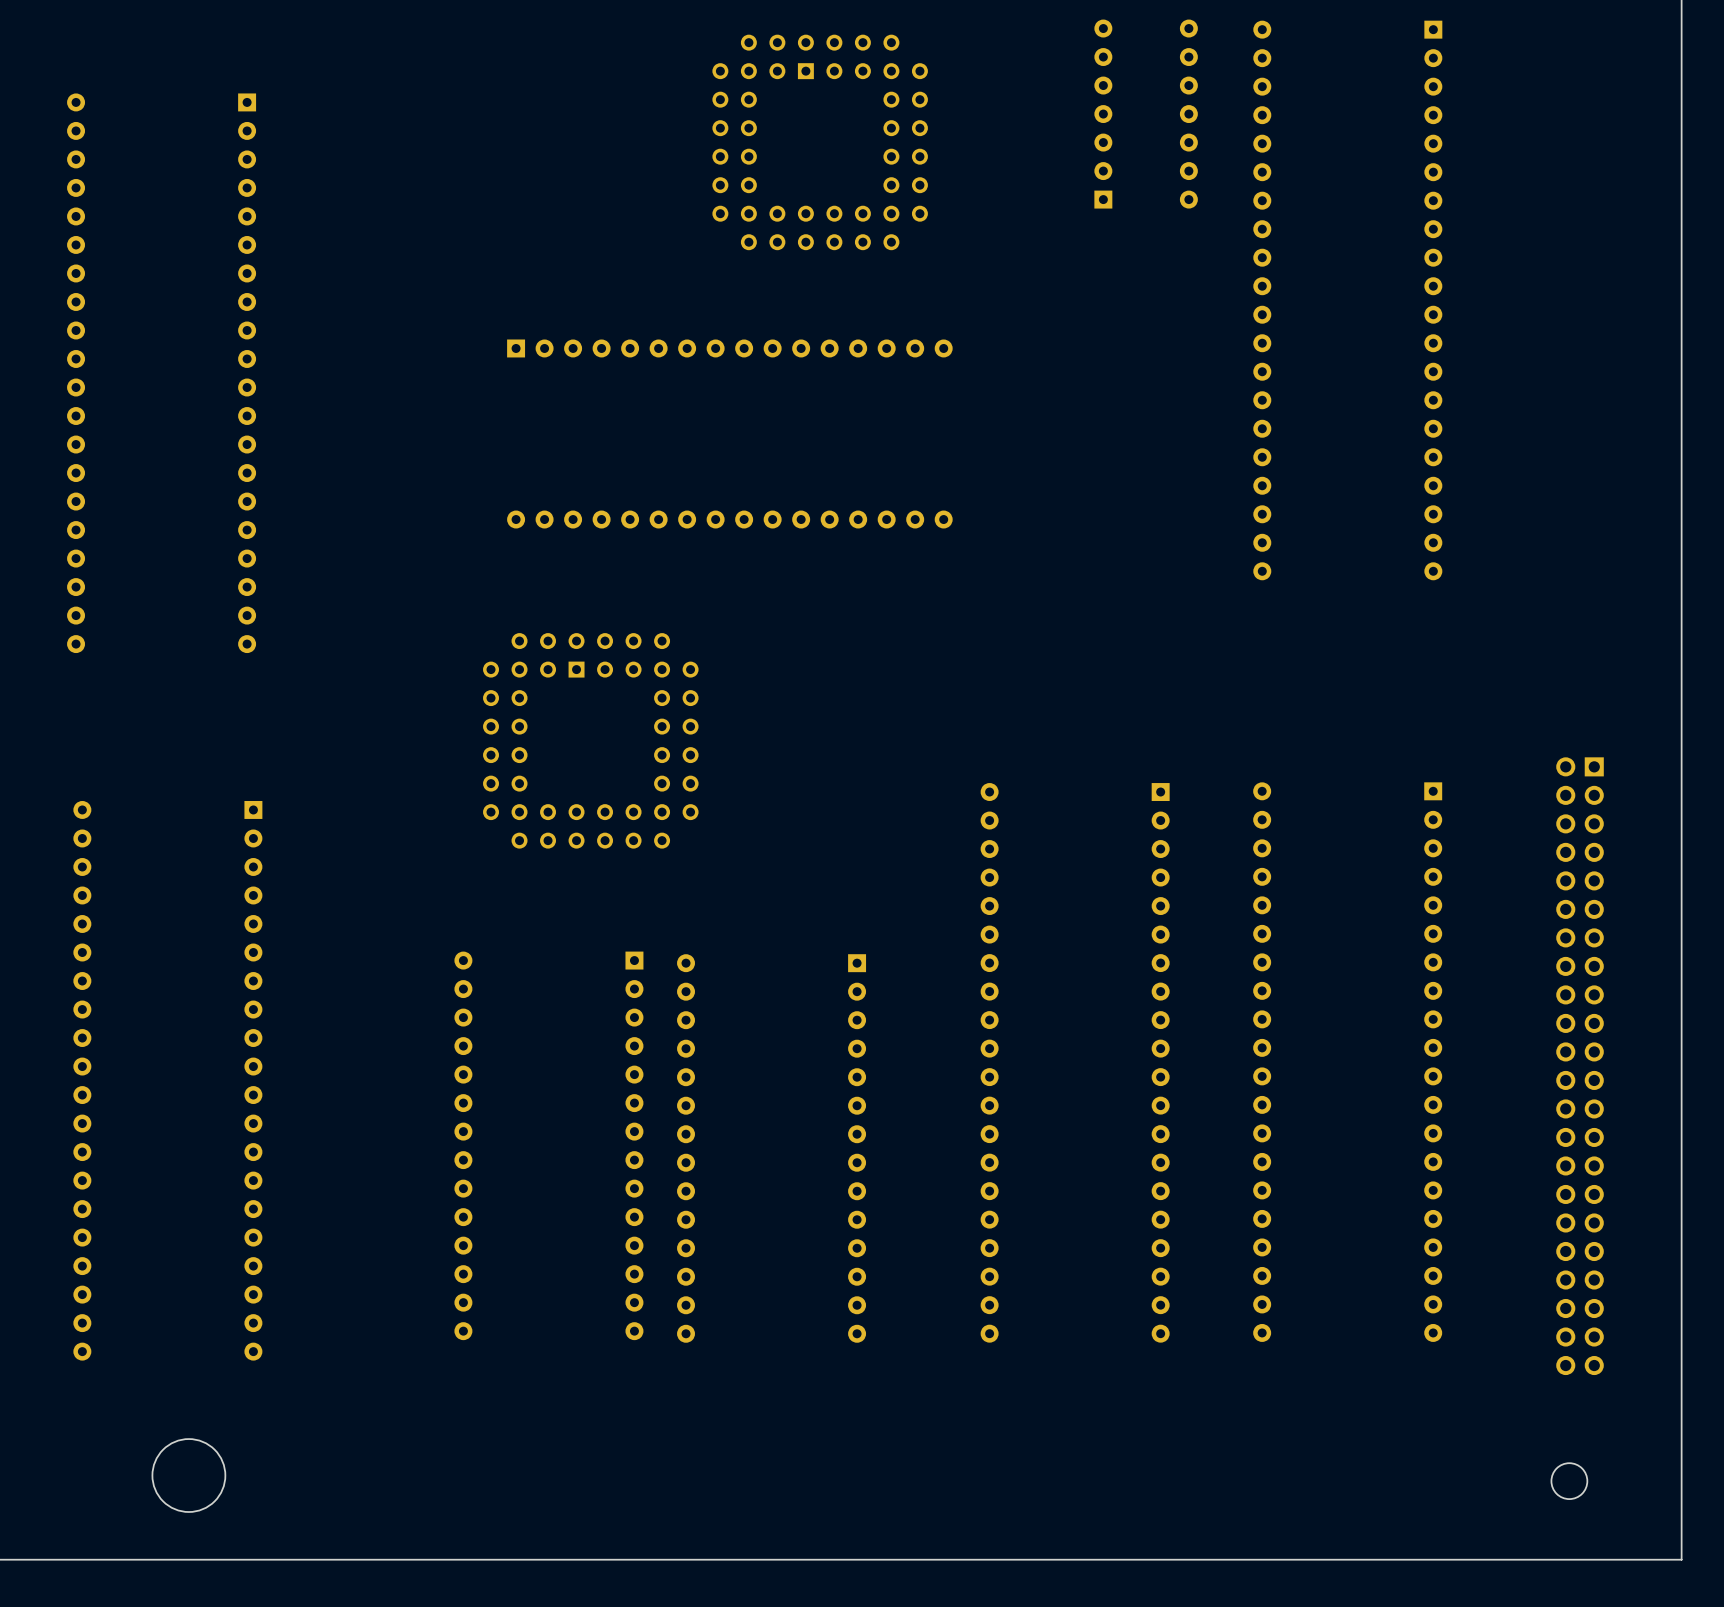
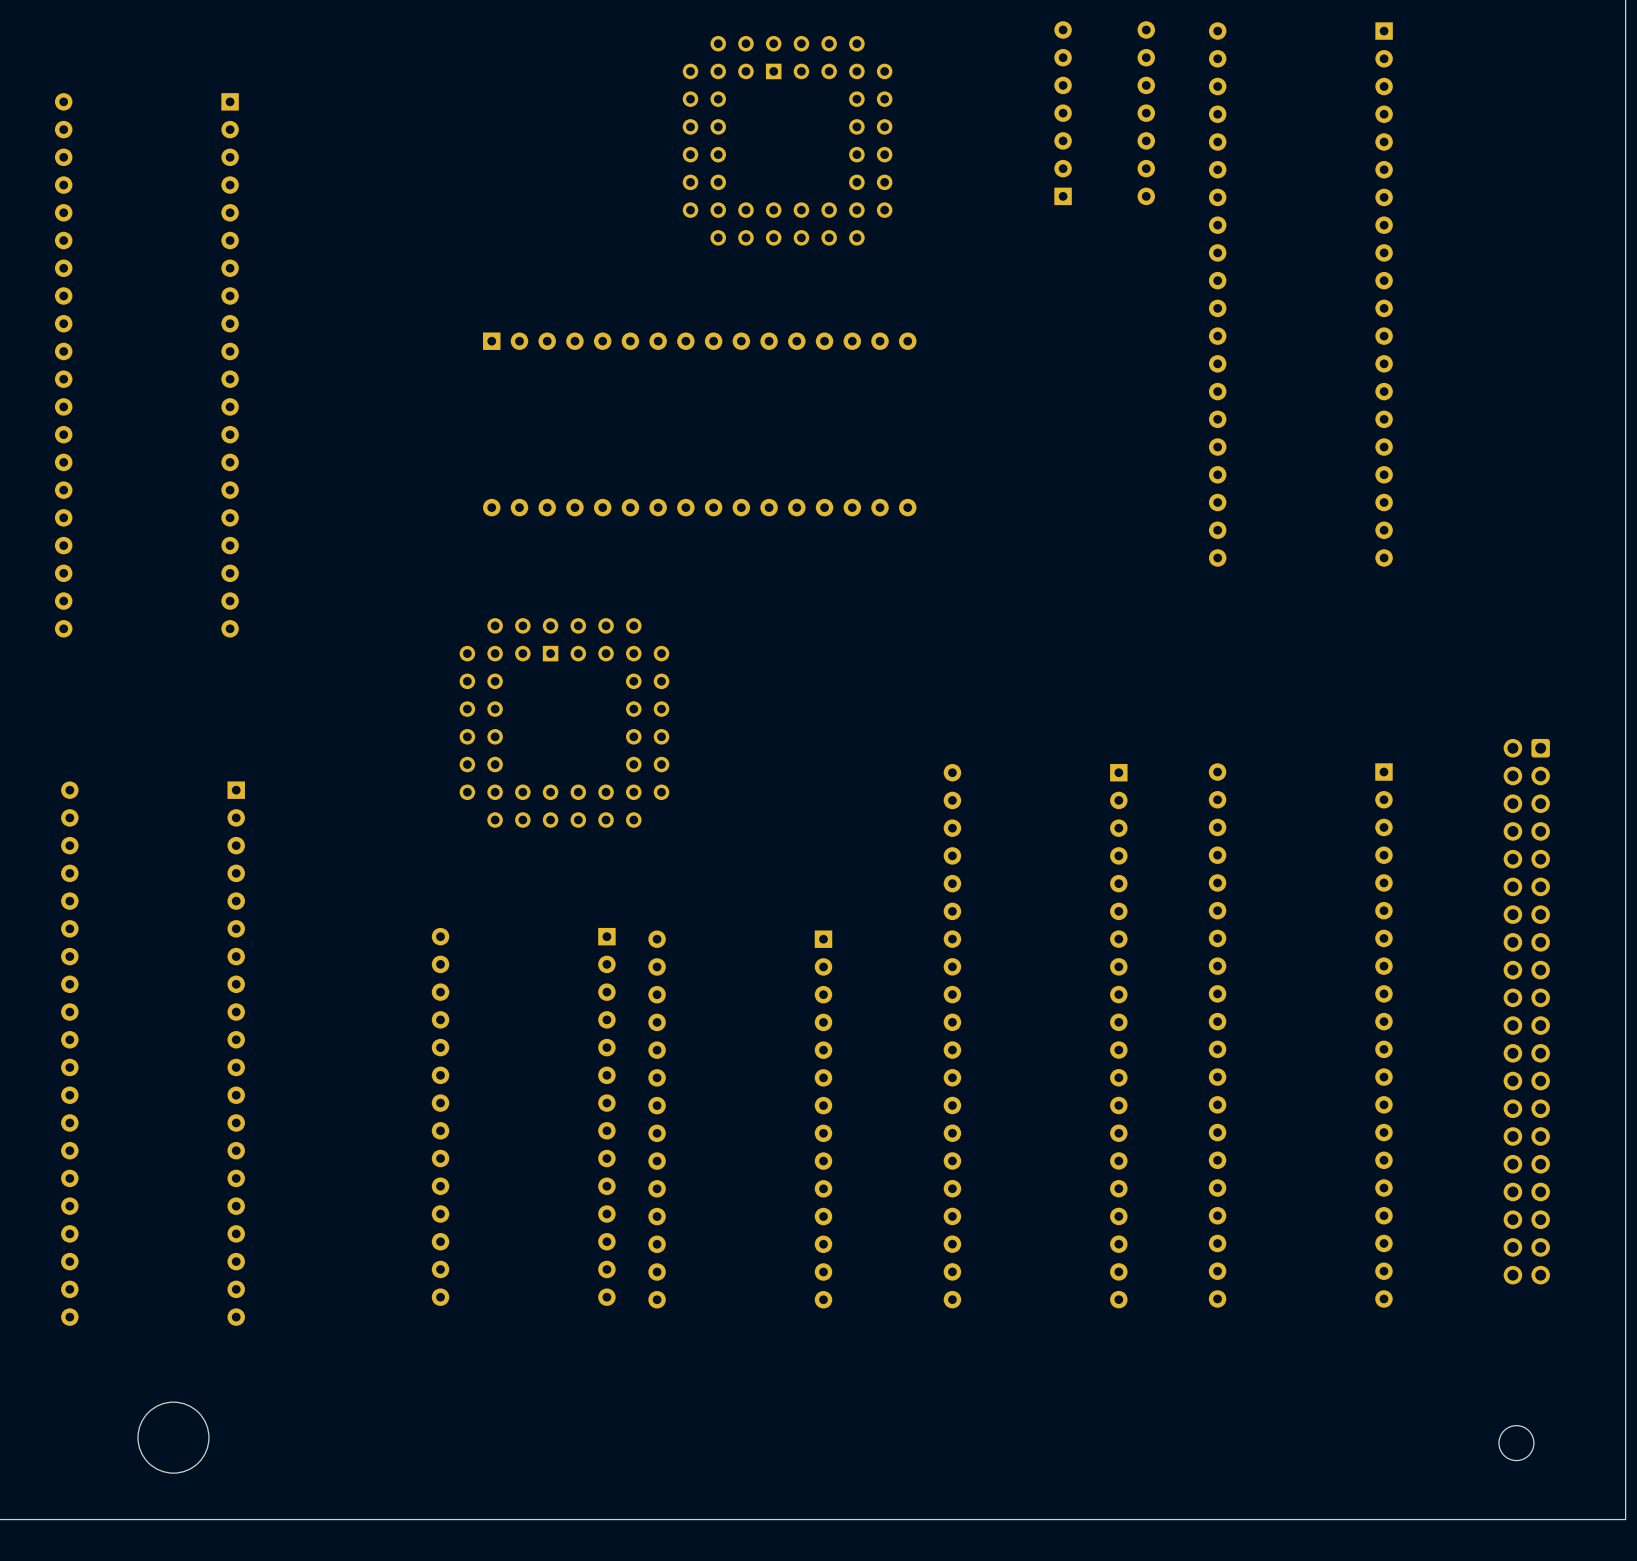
part: none -> (1526, 1011)
part: (1580, 1066) -> none

